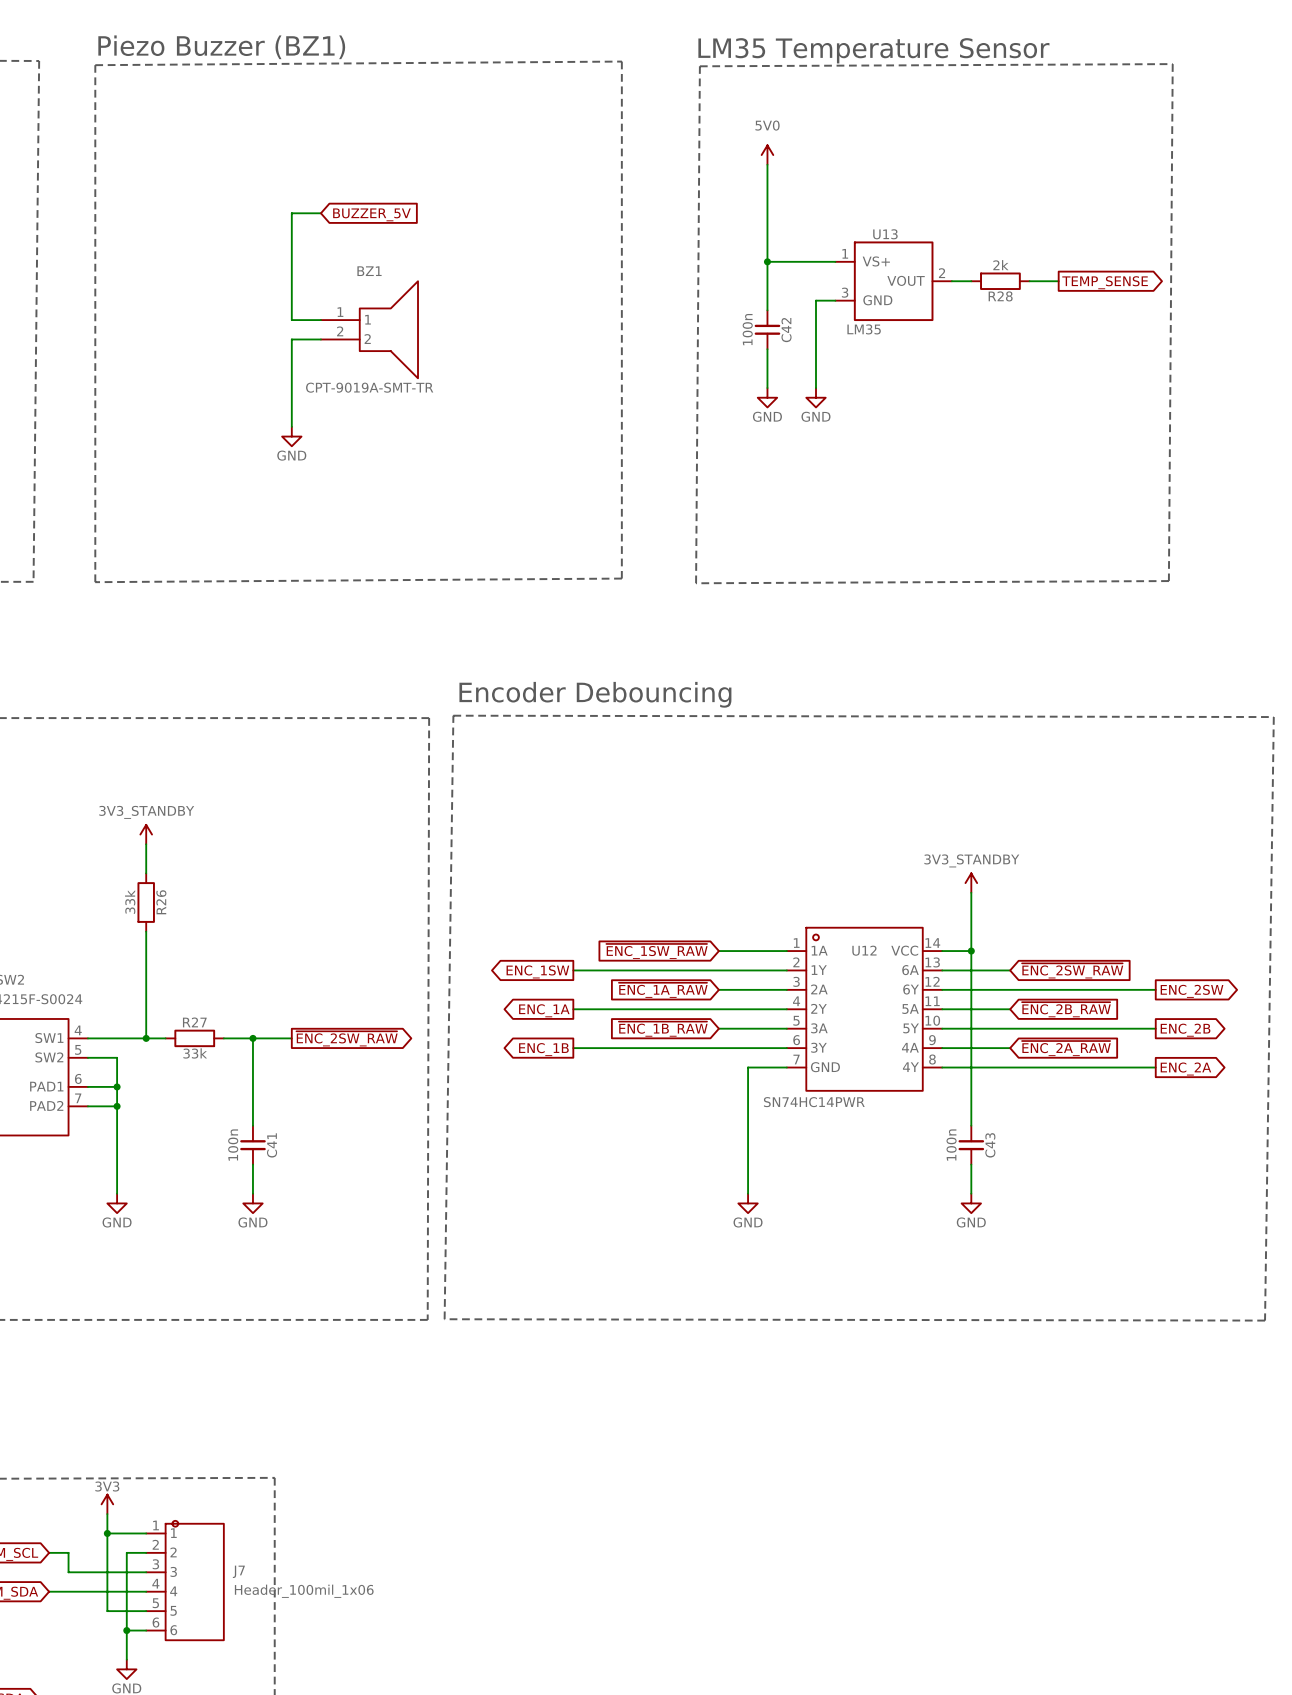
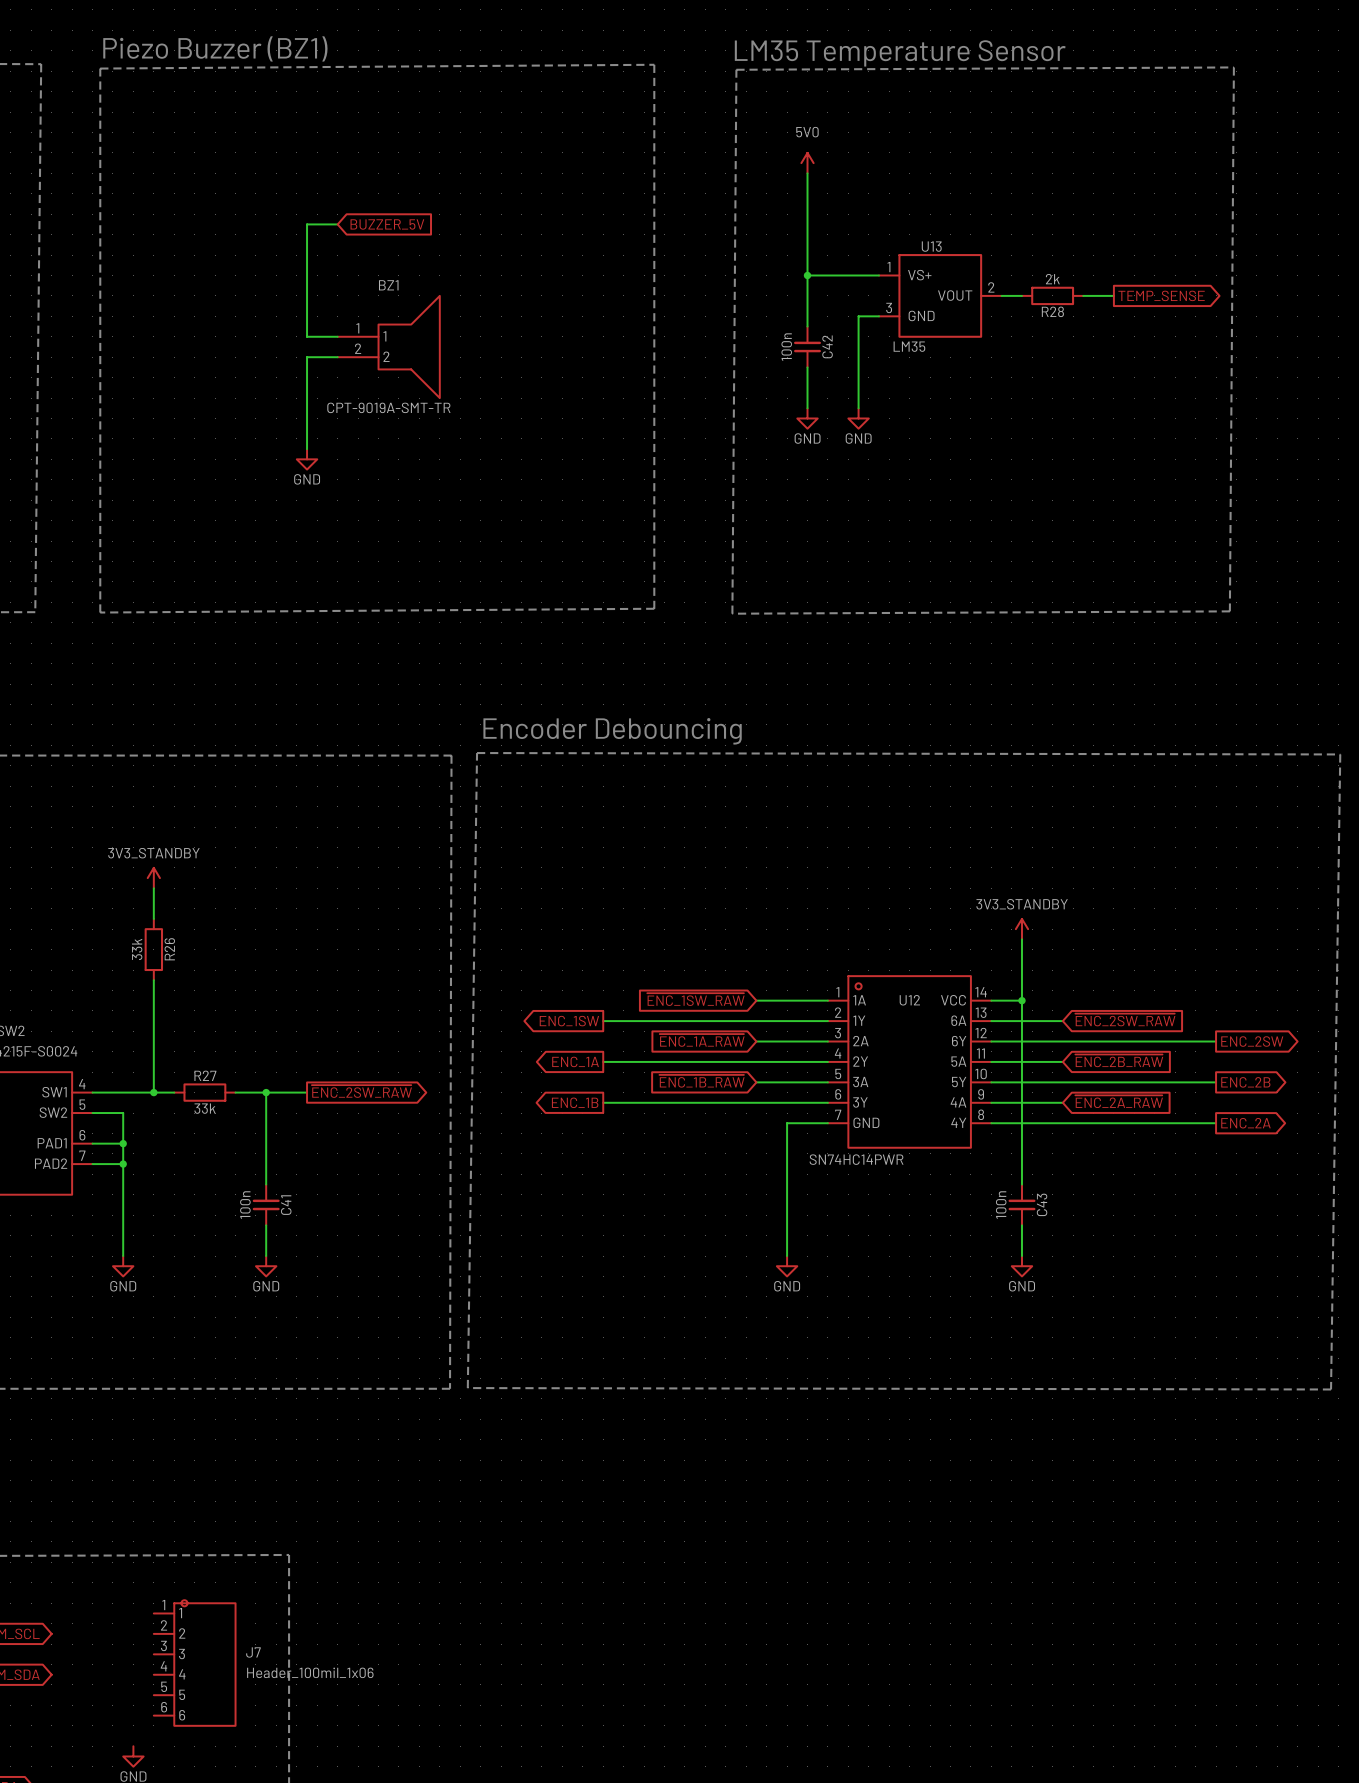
power symbol: 3V3 (107, 1504) -> none
wire: (107, 1514) (107, 1611) (146, 1611) -> none
wire: (107, 1533) (146, 1533) -> none
junction: (107, 1533) -> none
wire: (49, 1552) (68, 1552) (68, 1572) (146, 1572) -> none
wire: (146, 1552) (126, 1552) (126, 1659) -> none
wire: (49, 1591) (146, 1591) -> none
wire: (126, 1630) (146, 1630) -> none
junction: (126, 1630) -> none

